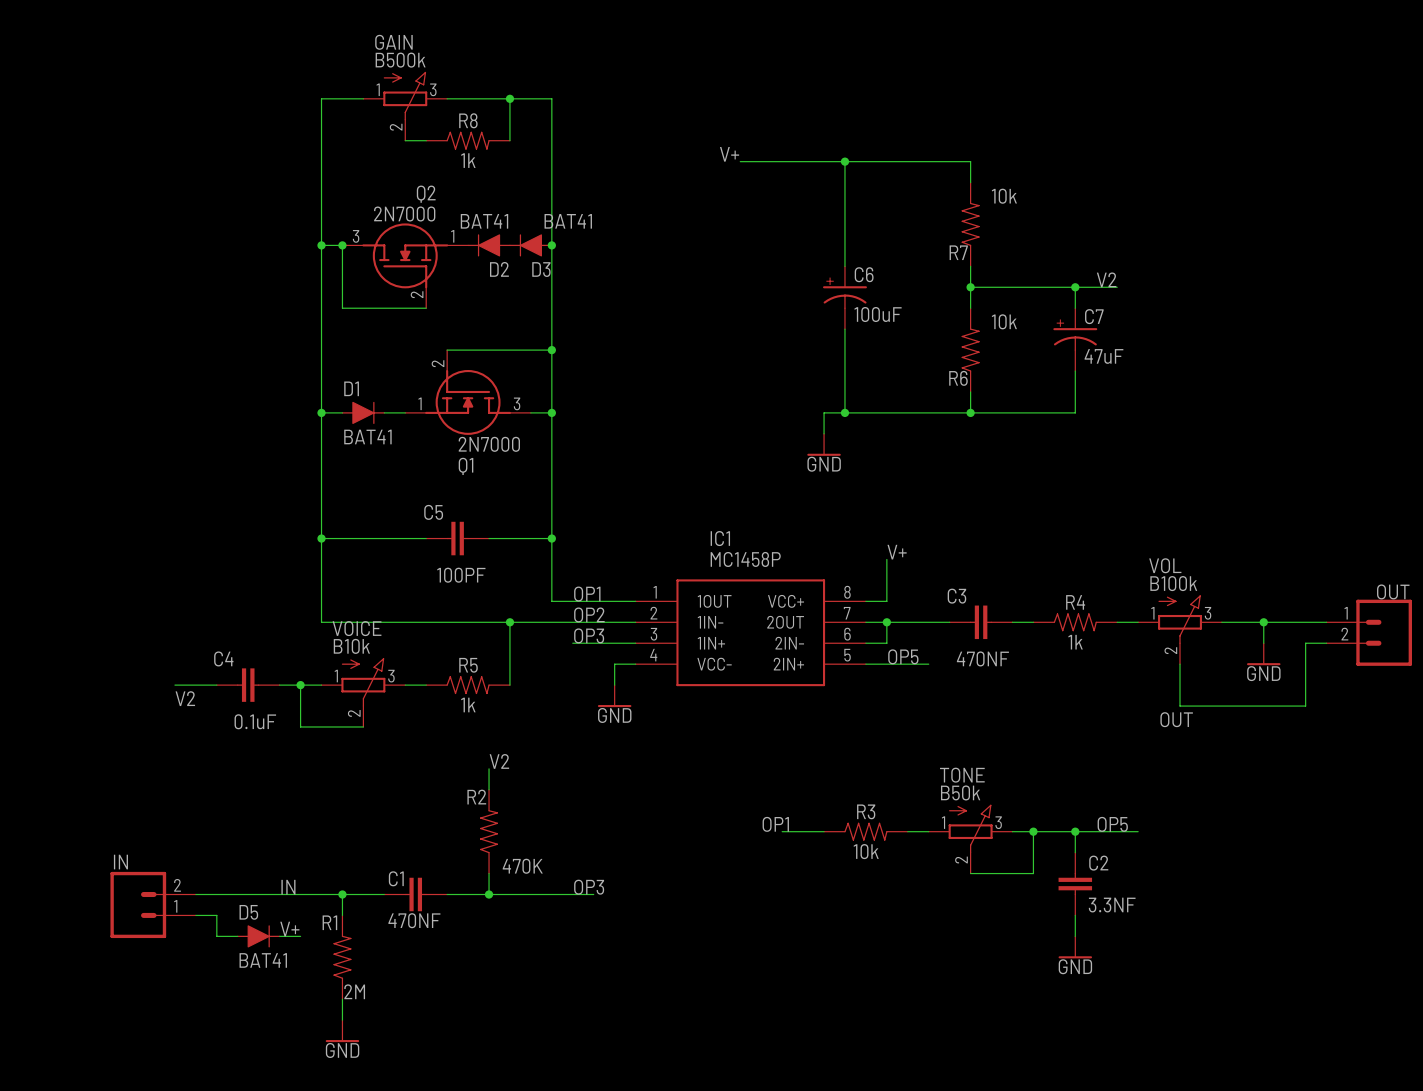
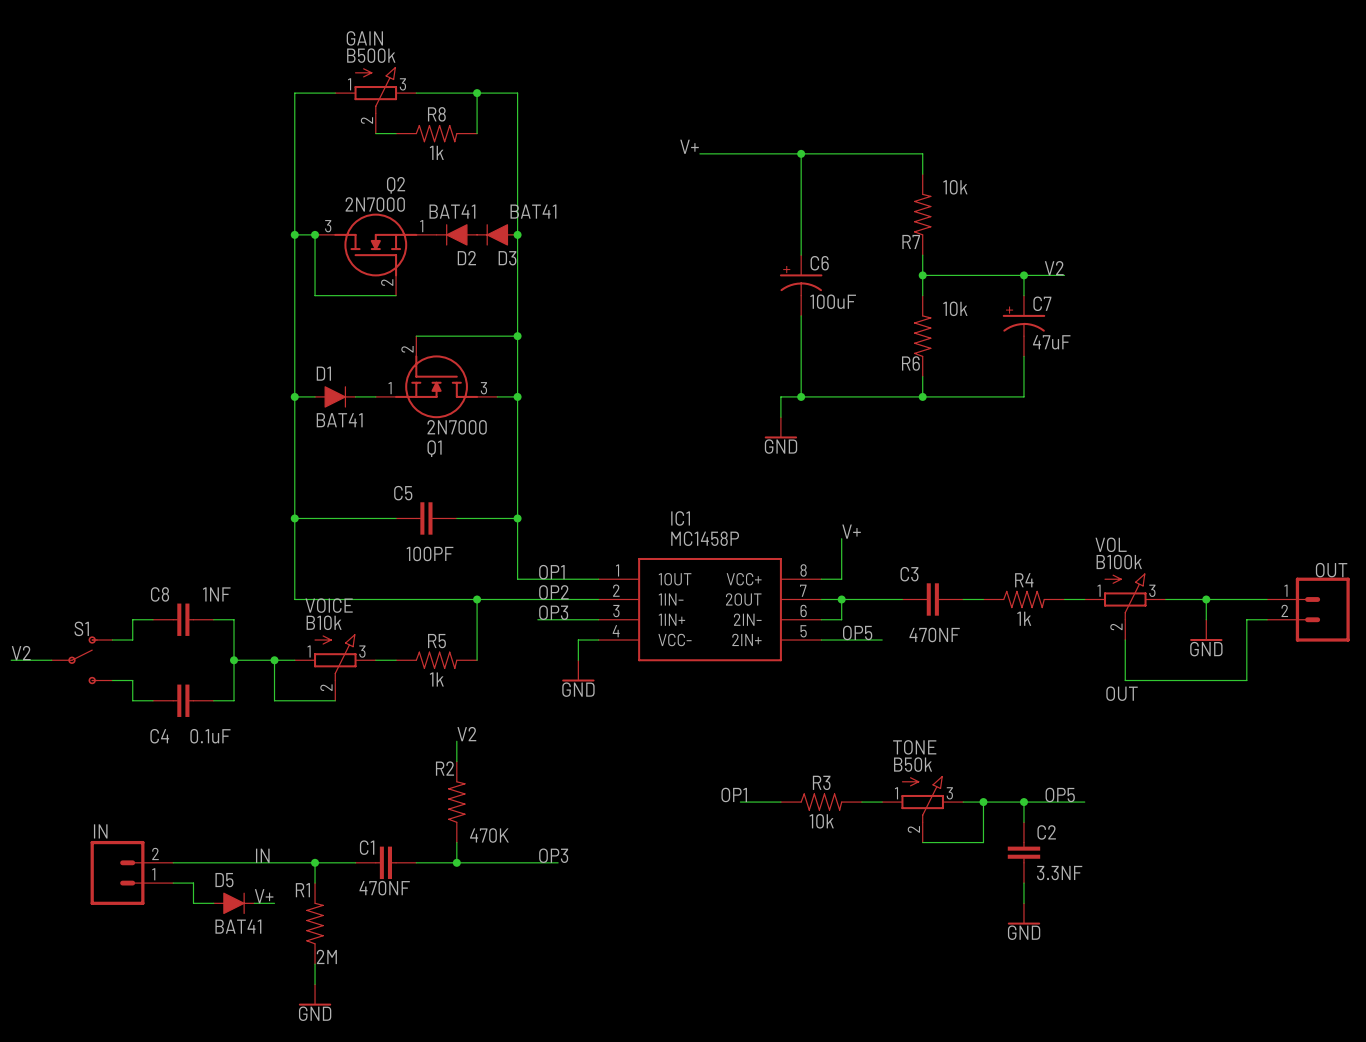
wire: none -> (152, 619) (132, 619) (132, 640) (112, 640)
C8: none -> 1NF (183, 619)
wire: none -> (213, 619) (234, 619) (234, 700) (213, 700)
C4 name position: C4 (223, 658) -> C4 (159, 736)
S1: none -> (82, 660)
wire: (174, 685) (216, 685) -> (11, 660) (51, 660)
C4 position: (248, 685) -> (183, 700)
junction: none -> (234, 660)
label position: V2 (185, 698) -> V2 (21, 653)
wire: none -> (112, 680) (132, 680) (132, 700) (152, 700)
C4 value position: 0.1uF (255, 721) -> 0.1uF (210, 736)

